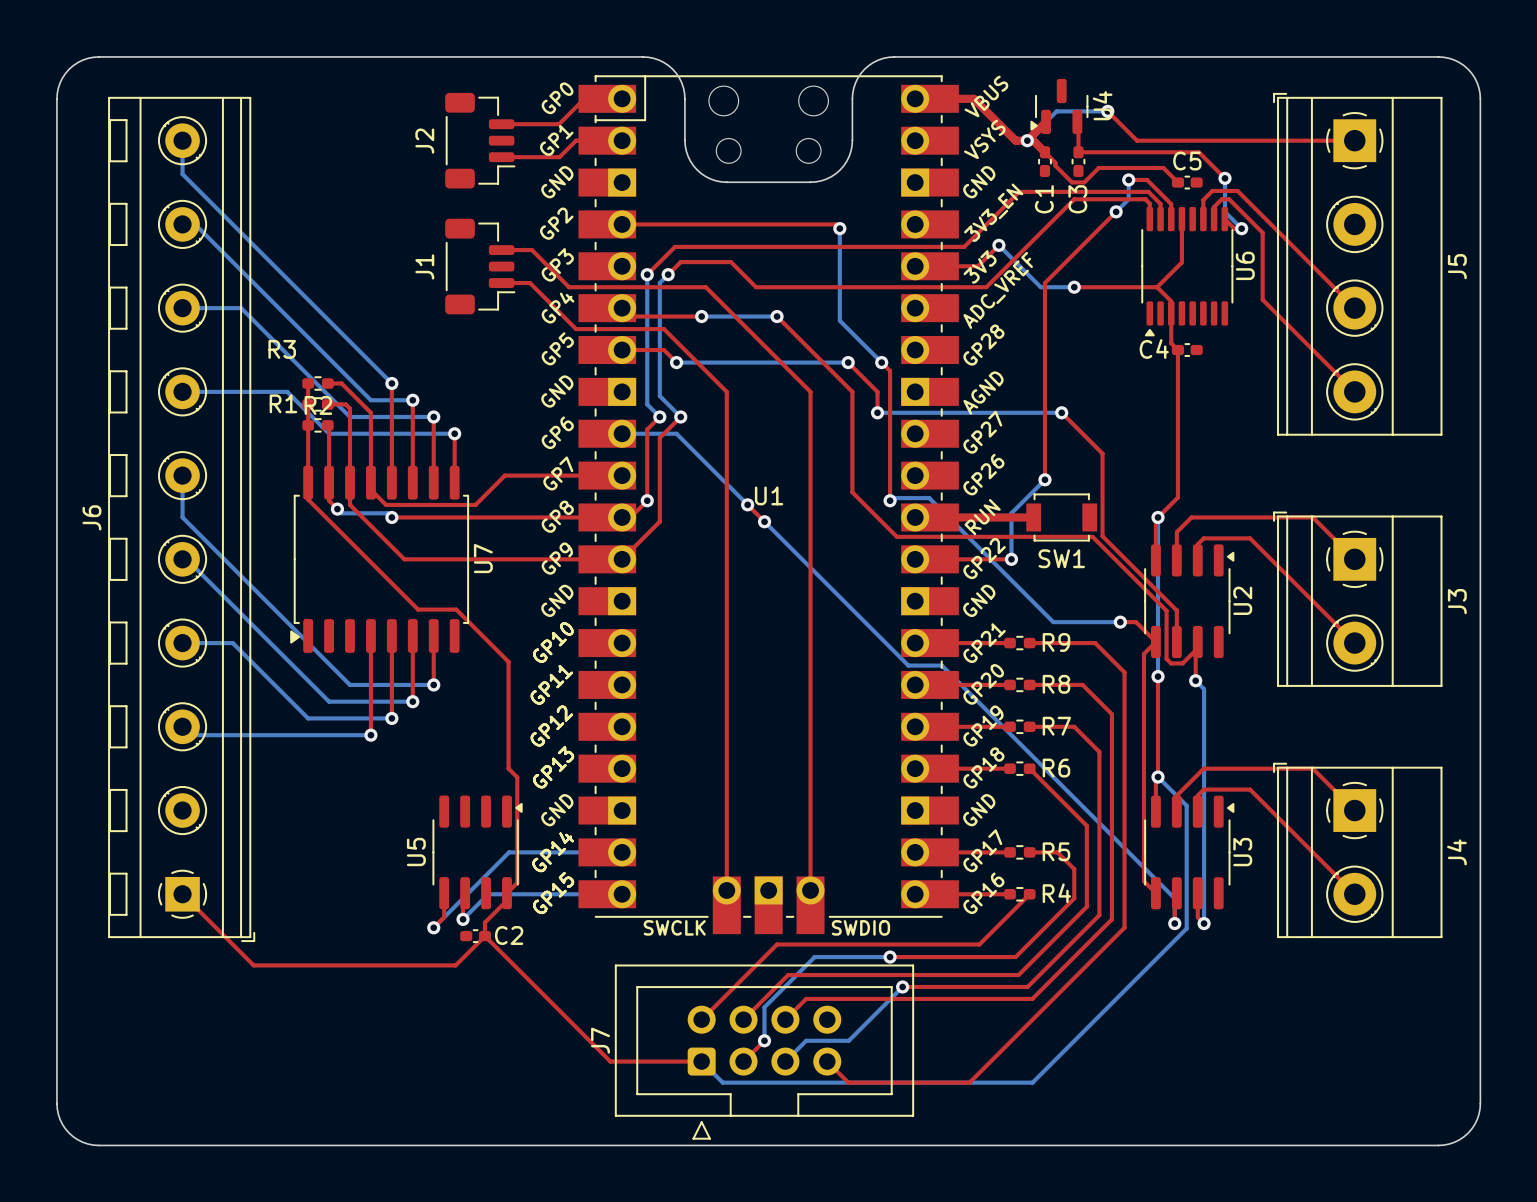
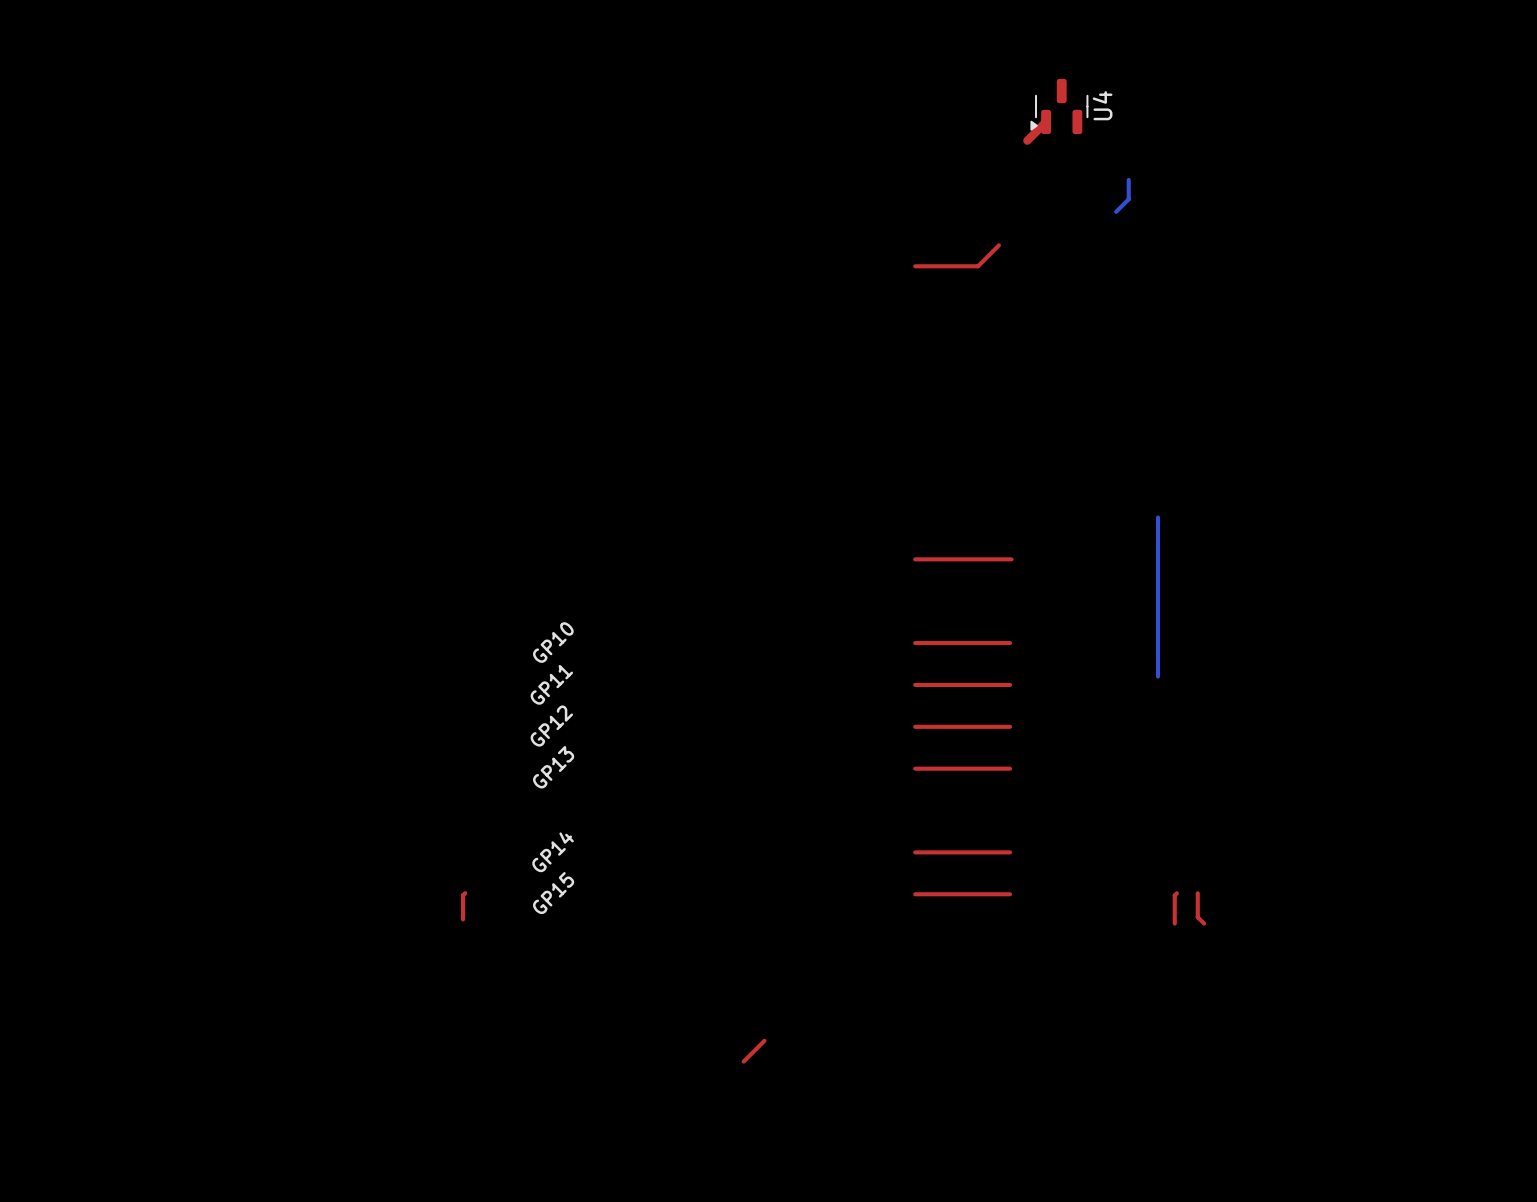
board edge: (98, 56) (653, 58) (672, 69) (681, 82) (684, 98) (685, 145) (690, 161) (705, 176) (726, 182) (816, 181) (836, 173) (846, 161) (850, 151) (852, 93) (855, 82) (868, 65) (888, 57) (1438, 56) (1449, 58) (1464, 65) (1477, 82) (1480, 98) (1480, 1103) (1477, 1119) (1471, 1129) (1454, 1142) (1438, 1145) (98, 1145) (87, 1144) (73, 1136) (60, 1119) (56, 1103) (56, 98) (60, 82) (69, 69) (82, 60) (98, 56) -> none
top track: (622, 98) (584, 98) (559, 124) (501, 124) -> none
top track: (915, 98) (973, 98) (1015, 140) (1033, 140) (1072, 182) (1084, 182) (1098, 167) (1163, 167) (1177, 182) -> none
top track: (1107, 111) (1137, 140) (1354, 140) -> none
bottom track: (1107, 111) (1056, 111) (1027, 140) -> none
via: (1107, 111) -> none
top track: (1077, 121) (1078, 152) (1198, 152) (1225, 178) -> none
bottom track: (182, 140) (182, 174) (391, 383) -> none
J2: (480, 140) -> none
top track: (622, 140) (576, 140) (559, 157) (501, 157) -> none
via: (1027, 140) -> none
C1: (1044, 161) -> none
C3: (1078, 161) -> none
bottom track: (1225, 178) (1225, 212) (1241, 228) -> none
via: (1225, 178) -> none
top track: (1128, 179) (1147, 179) (1171, 204) (1171, 219) -> none
via: (1128, 179) -> none
C5: (1187, 182) -> none
top track: (1116, 211) (1044, 283) (1044, 479) -> none
via: (1116, 211) -> none
top track: (1149, 219) (1149, 203) (1145, 199) (1074, 199) (986, 287) (756, 287) (730, 262) (680, 262) (668, 274) -> none
top track: (1160, 219) (1160, 203) (1148, 191) (1019, 191) (964, 246) (675, 246) (647, 274) -> none
top track: (1181, 219) (1181, 262) (1157, 287) -> none
top track: (1203, 219) (1203, 199) (1212, 190) (1237, 190) (1354, 308) -> none
top track: (1214, 219) (1214, 206) (1221, 199) (1229, 199) (1262, 232) (1262, 299) (1354, 391) -> none
top track: (1224, 219) (1234, 228) (1241, 228) -> none
bottom track: (182, 224) (195, 224) (370, 400) (412, 400) -> none
top track: (622, 224) (835, 224) (839, 228) -> none
bottom track: (839, 228) (839, 320) (881, 362) -> none
via: (839, 228) -> none
via: (1241, 228) -> none
bottom track: (998, 245) (1040, 287) (1074, 287) -> none
via: (998, 245) -> none
top track: (501, 250) (531, 250) (569, 287) (705, 287) (810, 391) (810, 890) -> none
J5: (1357, 264) -> none
J1: (480, 266) -> none
U6: (1187, 271) -> none
bottom track: (647, 274) (647, 404) (659, 417) -> none
via: (647, 274) -> none
bottom track: (668, 274) (659, 283) (659, 396) (680, 417) -> none
via: (668, 274) -> none
top track: (501, 283) (530, 283) (576, 329) (664, 329) (726, 391) (726, 890) -> none
top track: (1074, 287) (1157, 287) -> none
via: (1074, 287) -> none
top track: (1157, 287) (1171, 301) (1171, 343) (1177, 350) (1177, 497) (1155, 519) (1155, 560) -> none
bottom track: (182, 308) (241, 308) (350, 417) (433, 417) -> none
top track: (622, 308) (630, 316) (701, 316) -> none
bottom track: (701, 316) (777, 316) -> none
via: (701, 316) -> none
top track: (777, 316) (852, 391) (852, 492) (896, 536) (1092, 536) (1166, 610) (1166, 658) (1171, 663) (1182, 663) (1197, 648) (1197, 642) (1195, 644) (1195, 680) -> none
via: (777, 316) -> none
top track: (622, 350) (664, 350) (676, 362) -> none
C4: (1187, 350) -> none
bottom track: (676, 362) (848, 362) -> none
via: (676, 362) -> none
top track: (848, 362) (877, 391) (877, 412) -> none
via: (848, 362) -> none
top track: (881, 362) (890, 370) (890, 500) -> none
via: (881, 362) -> none
top track: (308, 383) (308, 499) (418, 609) (456, 609) (508, 661) (508, 768) (517, 777) (517, 882) (507, 893) (507, 900) (484, 922) (484, 936) -> none
R3: (318, 383) -> none
top track: (329, 383) (341, 383) (370, 412) (370, 489) (386, 504) (475, 504) (504, 475) (622, 475) -> none
top track: (391, 383) (391, 482) -> none
via: (391, 383) -> none
bottom track: (182, 391) (287, 391) (329, 433) (454, 433) -> none
top track: (412, 400) (412, 482) -> none
via: (412, 400) -> none
R1: (318, 404) -> none
top track: (329, 404) (345, 404) (350, 408) (350, 504) (404, 559) (622, 559) (659, 521) (659, 437) (680, 417) -> none
bottom track: (877, 412) (1061, 412) -> none
via: (877, 412) -> none
top track: (1061, 412) (1102, 453) (1102, 536) (1176, 610) (1176, 642) -> none
via: (1061, 412) -> none
top track: (433, 417) (433, 482) -> none
via: (433, 417) -> none
top track: (659, 417) (647, 429) (647, 500) (630, 517) (391, 517) -> none
via: (659, 417) -> none
via: (680, 417) -> none
R2: (318, 425) -> none
top track: (329, 425) (329, 500) (337, 509) -> none
top track: (454, 433) (454, 482) -> none
via: (454, 433) -> none
bottom track: (622, 433) (676, 433) (747, 504) -> none
bottom track: (182, 475) (182, 517) (350, 684) (433, 684) -> none
bottom track: (1044, 479) (1011, 513) (1011, 559) -> none
via: (1044, 479) -> none
via: (647, 500) -> none
bottom track: (890, 500) (892, 498) (929, 498) (1053, 622) (1120, 622) -> none
via: (890, 500) -> none
top track: (747, 504) (764, 521) -> none
via: (747, 504) -> none
U1: (768, 504) -> none
bottom track: (337, 509) (341, 513) (387, 513) (391, 517) -> none
via: (337, 509) -> none
via: (391, 517) -> none
top track: (915, 517) (1033, 517) -> none
SW1: (1061, 517) -> none
via: (1158, 517) -> none
J6: (181, 519) -> none
bottom track: (764, 521) (908, 665) (941, 665) (1174, 898) (1174, 923) -> none
via: (764, 521) -> none
bottom track: (182, 559) (186, 559) (329, 701) (412, 701) -> none
U7: (379, 559) -> none
via: (1011, 559) -> none
top track: (1354, 559) (1312, 517) (1191, 517) (1176, 532) (1176, 560) -> none
top track: (1197, 560) (1197, 544) (1203, 538) (1250, 538) (1354, 643) -> none
J3: (1357, 599) -> none
U2: (1189, 601) -> none
top track: (1120, 622) (1136, 622) (1155, 642) (1143, 653) (1143, 881) (1155, 893) -> none
via: (1120, 622) -> none
top track: (370, 635) (370, 735) -> none
top track: (391, 635) (391, 718) -> none
top track: (412, 635) (412, 701) -> none
top track: (433, 635) (433, 684) -> none
bottom track: (182, 643) (232, 643) (308, 718) (391, 718) -> none
R9: (1019, 643) -> none
top track: (1029, 643) (1095, 643) (1124, 672) (1124, 927) (969, 1082) (848, 1082) (827, 1061) -> none
top track: (1158, 676) (1158, 777) (1155, 779) (1155, 811) -> none
via: (1158, 676) -> none
bottom track: (1195, 680) (1204, 689) (1204, 923) -> none
via: (1195, 680) -> none
via: (433, 684) -> none
R8: (1019, 684) -> none
top track: (1029, 684) (1082, 684) (1111, 714) (1111, 919) (1032, 998) (806, 998) (785, 1019) -> none
via: (412, 701) -> none
via: (391, 718) -> none
bottom track: (182, 726) (190, 735) (370, 735) -> none
R7: (1019, 726) -> none
top track: (1029, 726) (1074, 726) (1099, 751) (1099, 915) (1027, 986) (902, 986) -> none
via: (370, 735) -> none
R6: (1019, 768) -> none
top track: (1029, 768) (1086, 825) (1086, 906) (1018, 975) (788, 975) (743, 1019) -> none
bottom track: (1158, 777) (1186, 805) (1186, 928) (1032, 1082) (722, 1082) (701, 1061) -> none
via: (1158, 777) -> none
top track: (1354, 810) (1312, 768) (1203, 768) (1176, 795) (1176, 811) -> none
top track: (1197, 811) (1197, 795) (1203, 789) (1250, 789) (1354, 894) -> none
J4: (1357, 850) -> none
U5: (477, 852) -> none
bottom track: (622, 852) (509, 852) (433, 927) -> none
R5: (1019, 852) -> none
top track: (1029, 852) (1057, 852) (1074, 869) (1074, 898) (1015, 957) (890, 957) -> none
U3: (1189, 852) -> none
top track: (444, 893) (444, 917) (433, 927) -> none
top track: (182, 894) (253, 965) (455, 965) (484, 936) -> none
bottom track: (622, 894) (488, 894) (463, 919) -> none
R4: (1019, 894) -> none
top track: (1029, 894) (979, 944) (777, 944) (701, 1019) -> none
via: (463, 919) -> none
via: (1174, 923) -> none
via: (1204, 923) -> none
via: (433, 927) -> none
C2: (475, 936) -> none
top track: (484, 936) (610, 1061) (701, 1061) -> none
bottom track: (890, 957) (814, 957) (764, 1007) (764, 1040) -> none
via: (890, 957) -> none
bottom track: (902, 986) (848, 1040) (806, 1040) (785, 1061) -> none
via: (902, 986) -> none
via: (764, 1040) -> none
J7: (764, 1052) -> none

